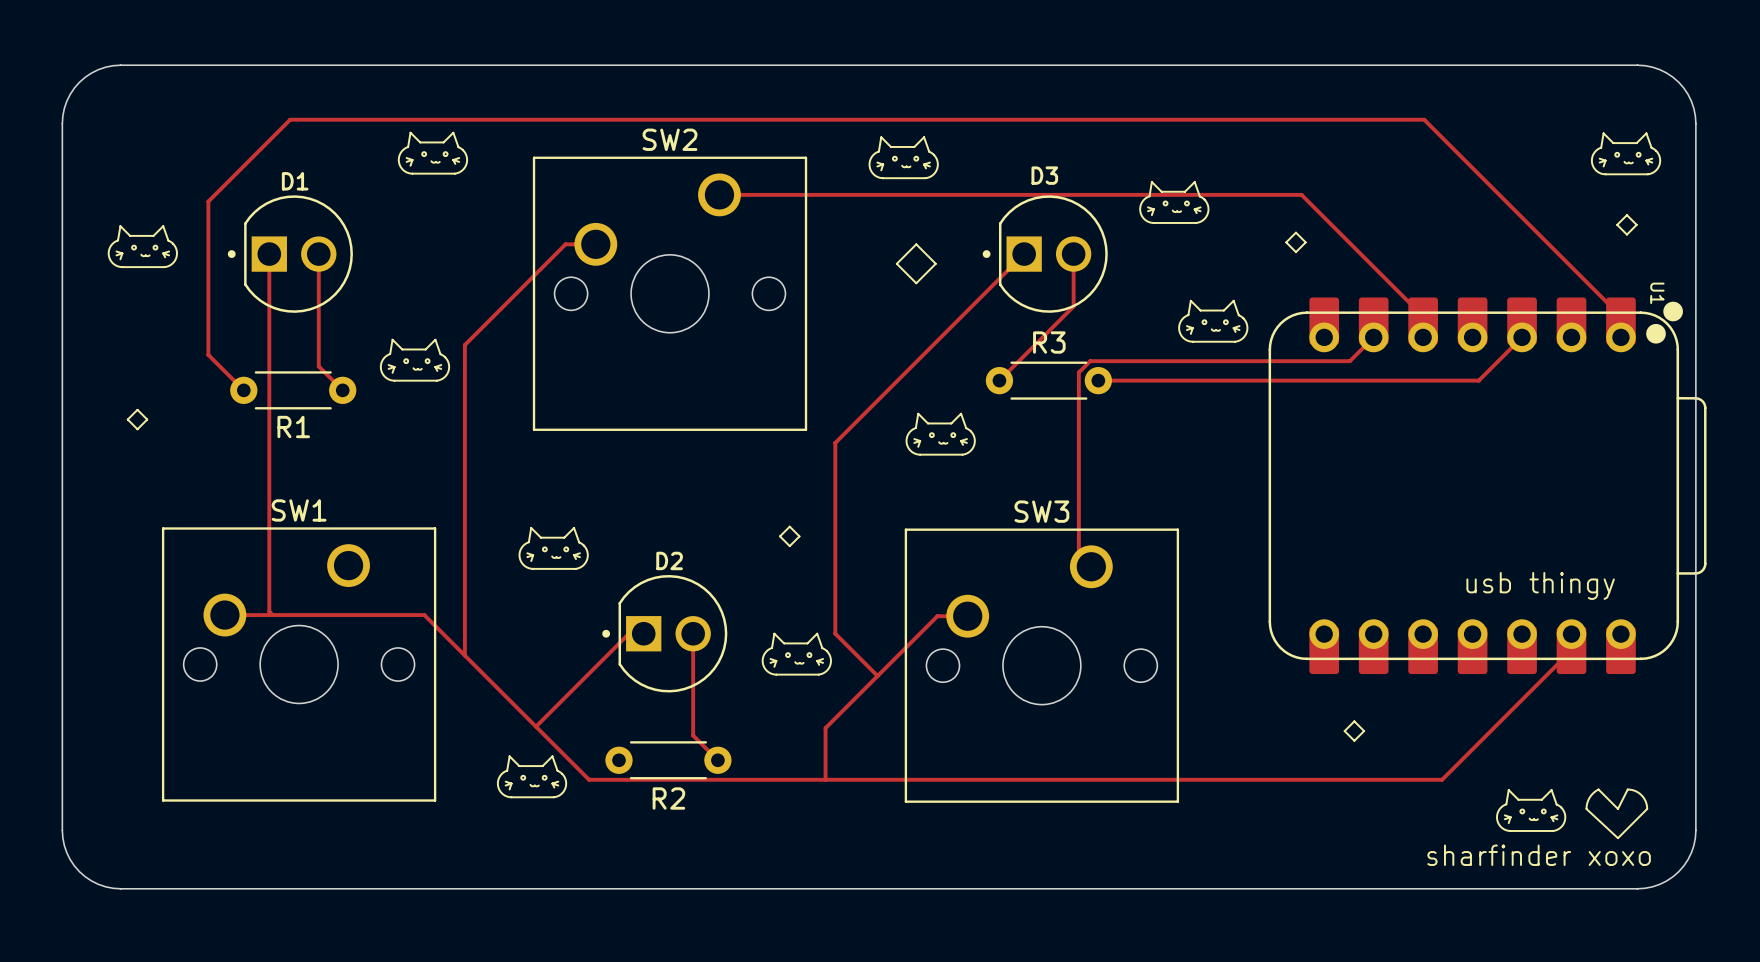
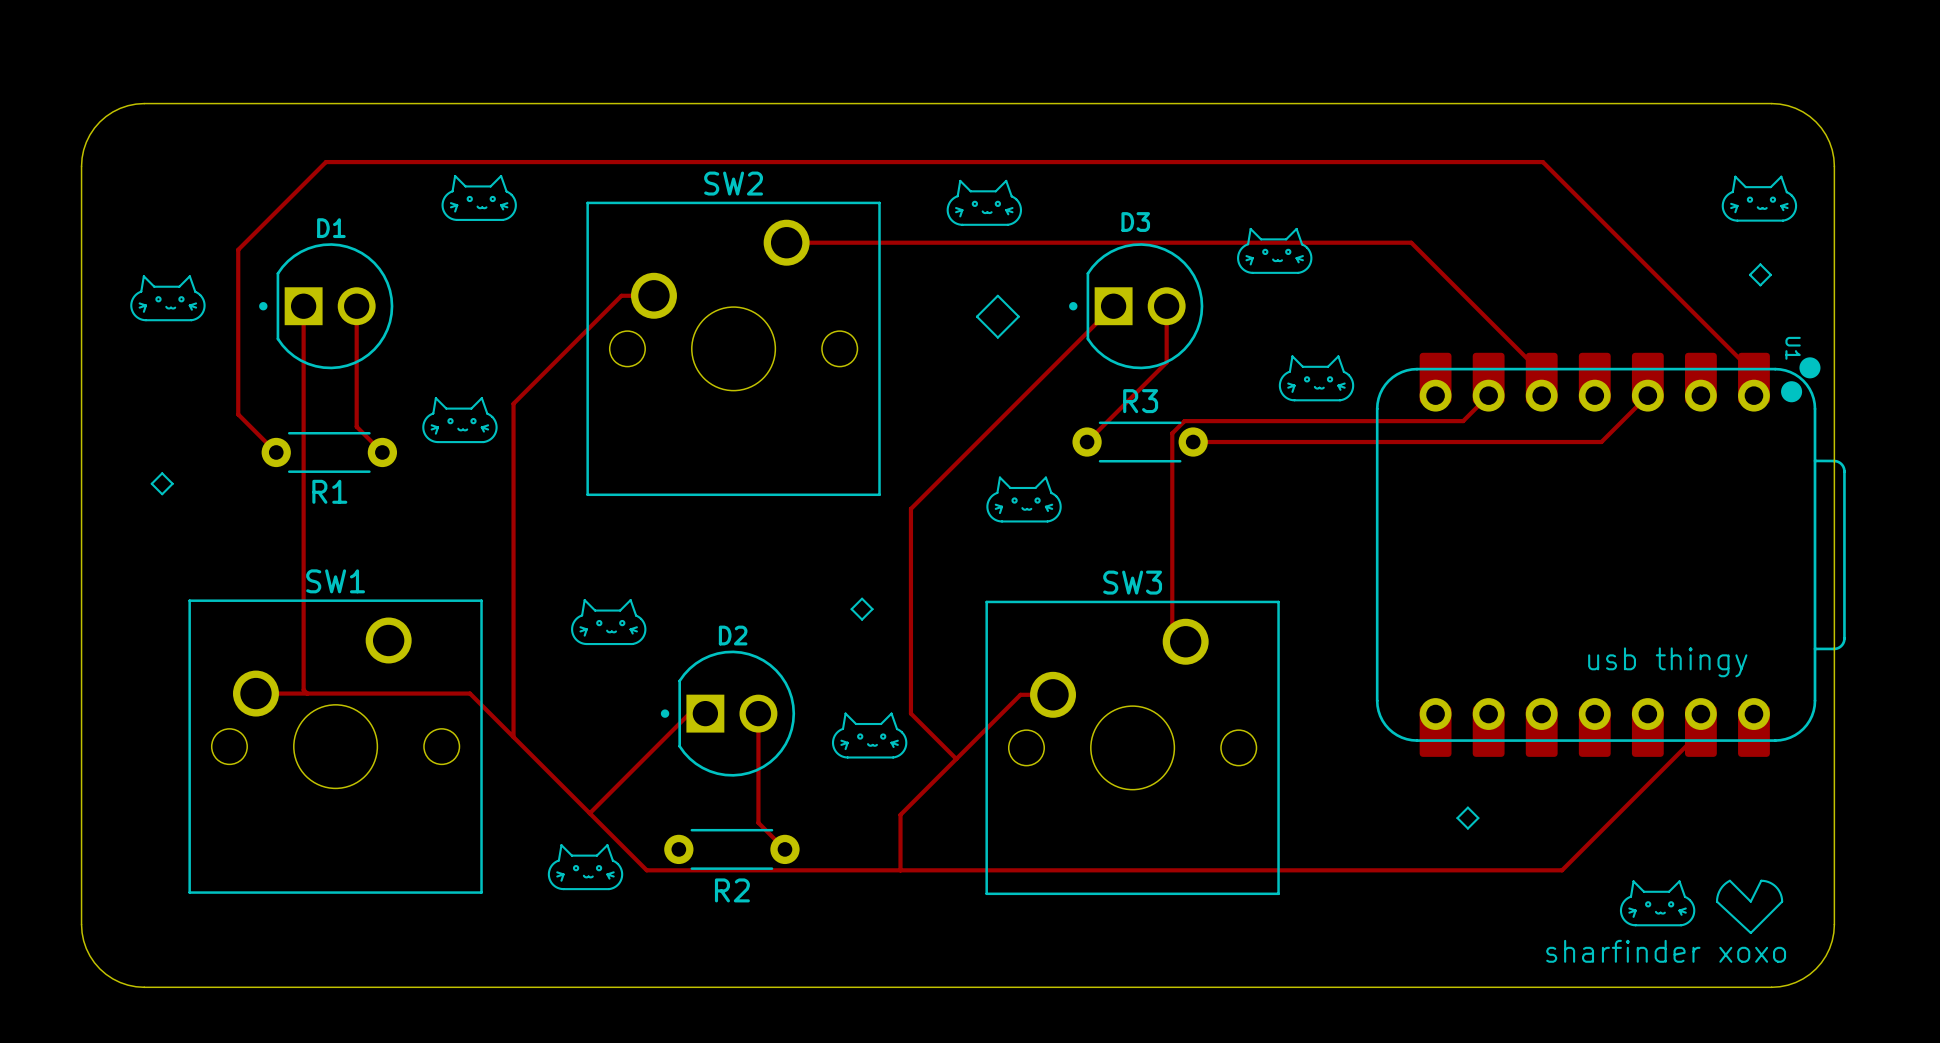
line: (1295, 232) (1286, 242) (1295, 252) (1305, 242) (1295, 232) -> none

